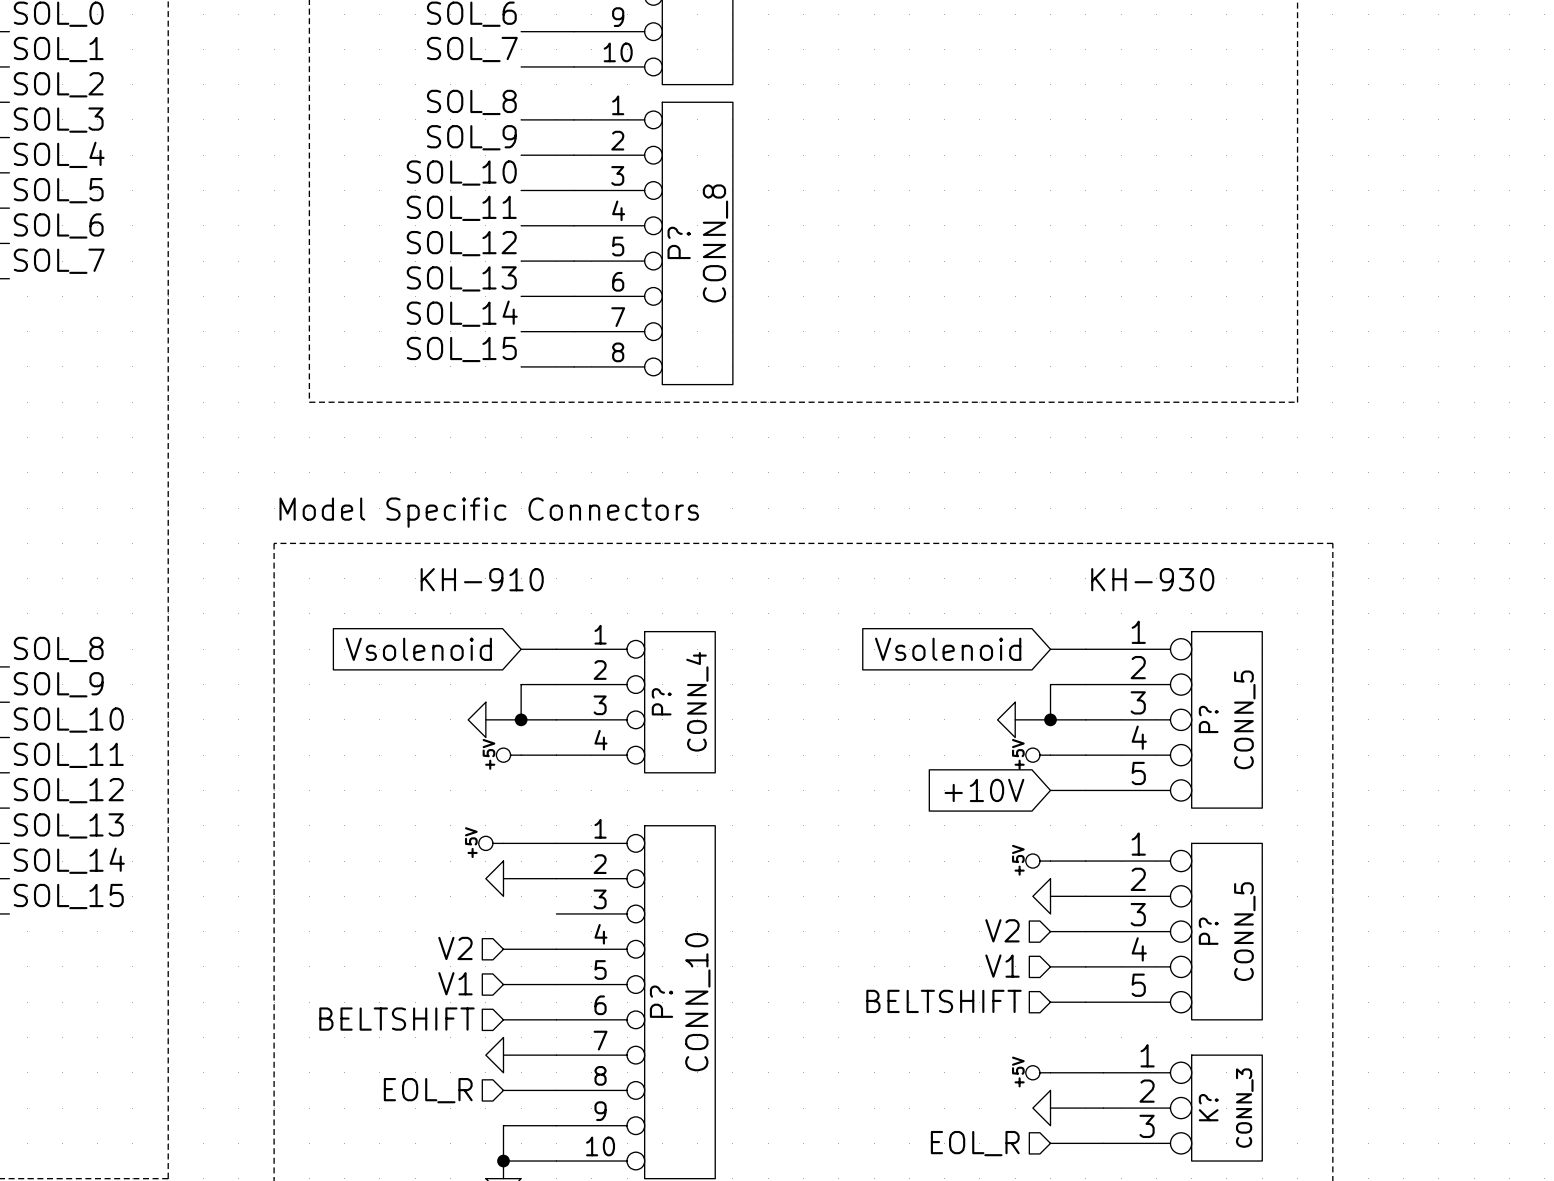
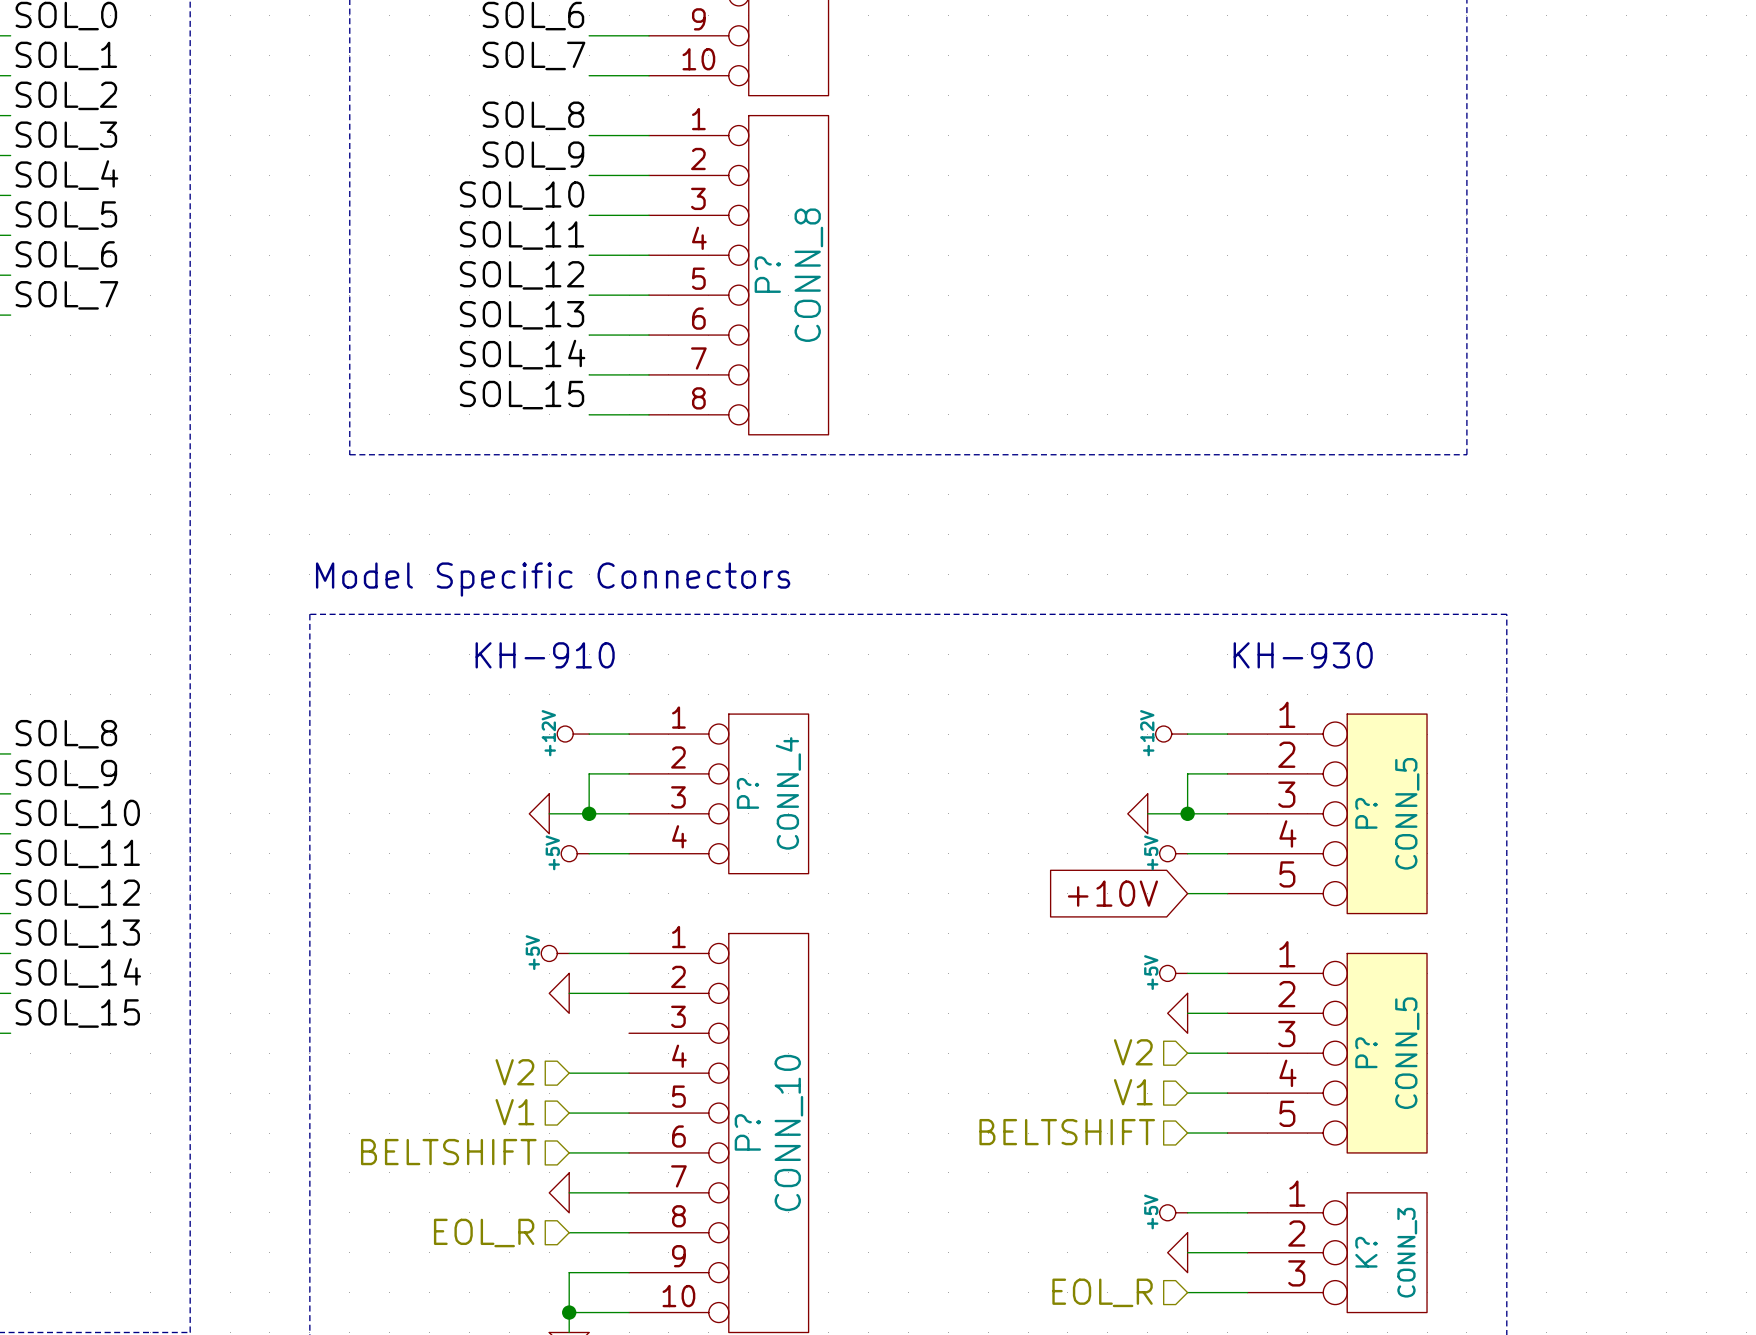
global label: Vsolenoid (418, 649) -> none
power symbol: none -> +12V (573, 734)
global label: Vsolenoid (948, 649) -> none
power symbol: none -> +12V (1171, 734)

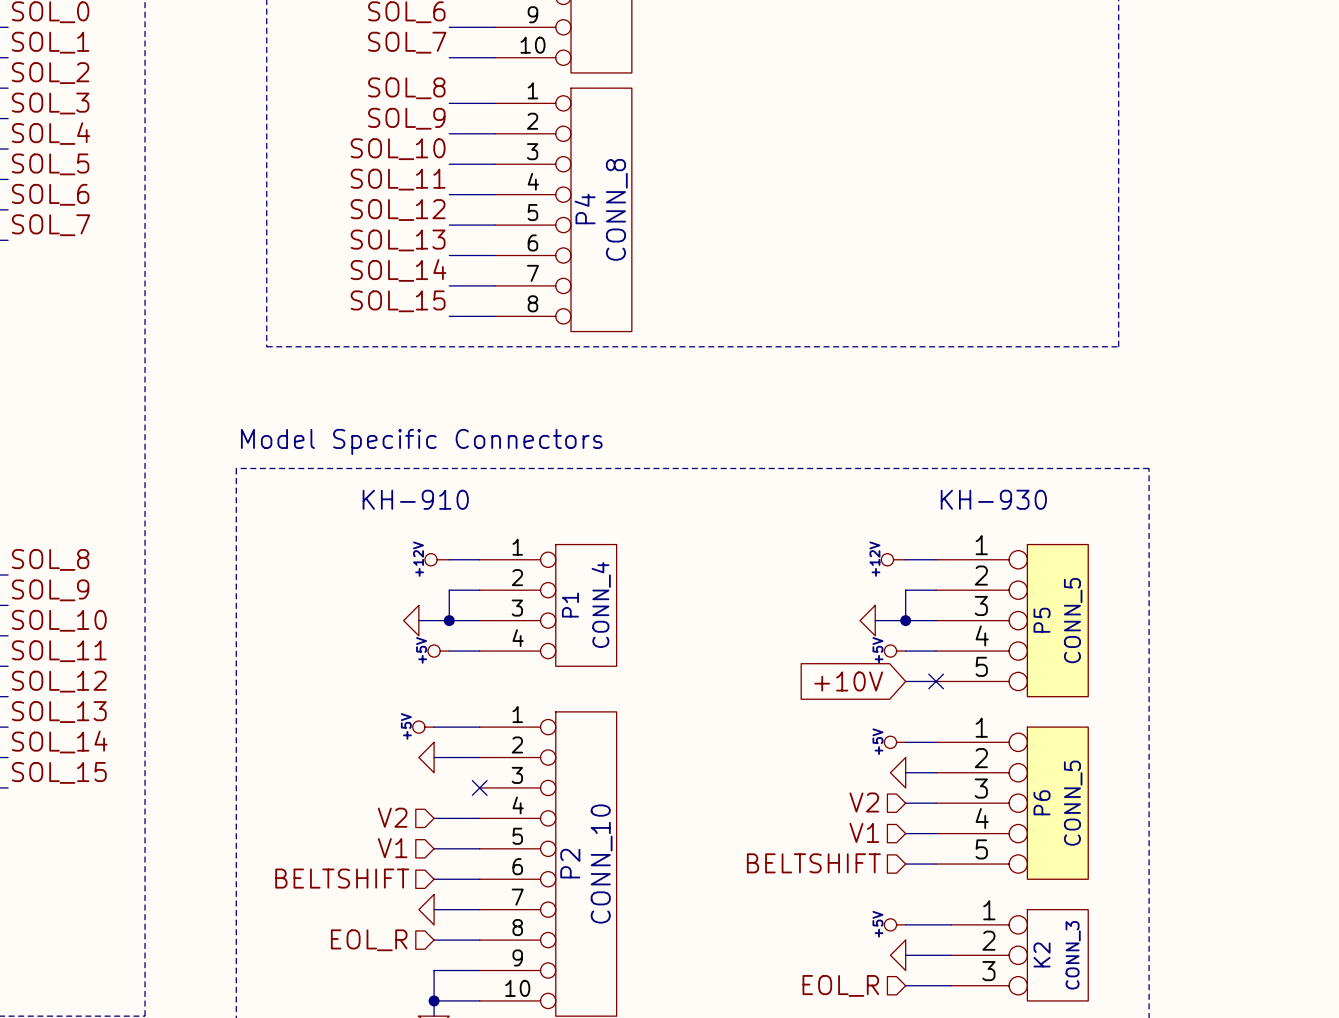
P? name: P? (767, 274) -> P4 (585, 208)
P? name: P? (748, 793) -> P1 (570, 605)
P? name: P? (1366, 813) -> P5 (1042, 620)
no-connect mark: none -> (936, 681)
no-connect mark: none -> (479, 787)
P? name: P? (1366, 1052) -> P6 (1042, 802)
P? name: P? (747, 1132) -> P2 (570, 863)
K? name: K? (1366, 1252) -> K2 (1042, 954)

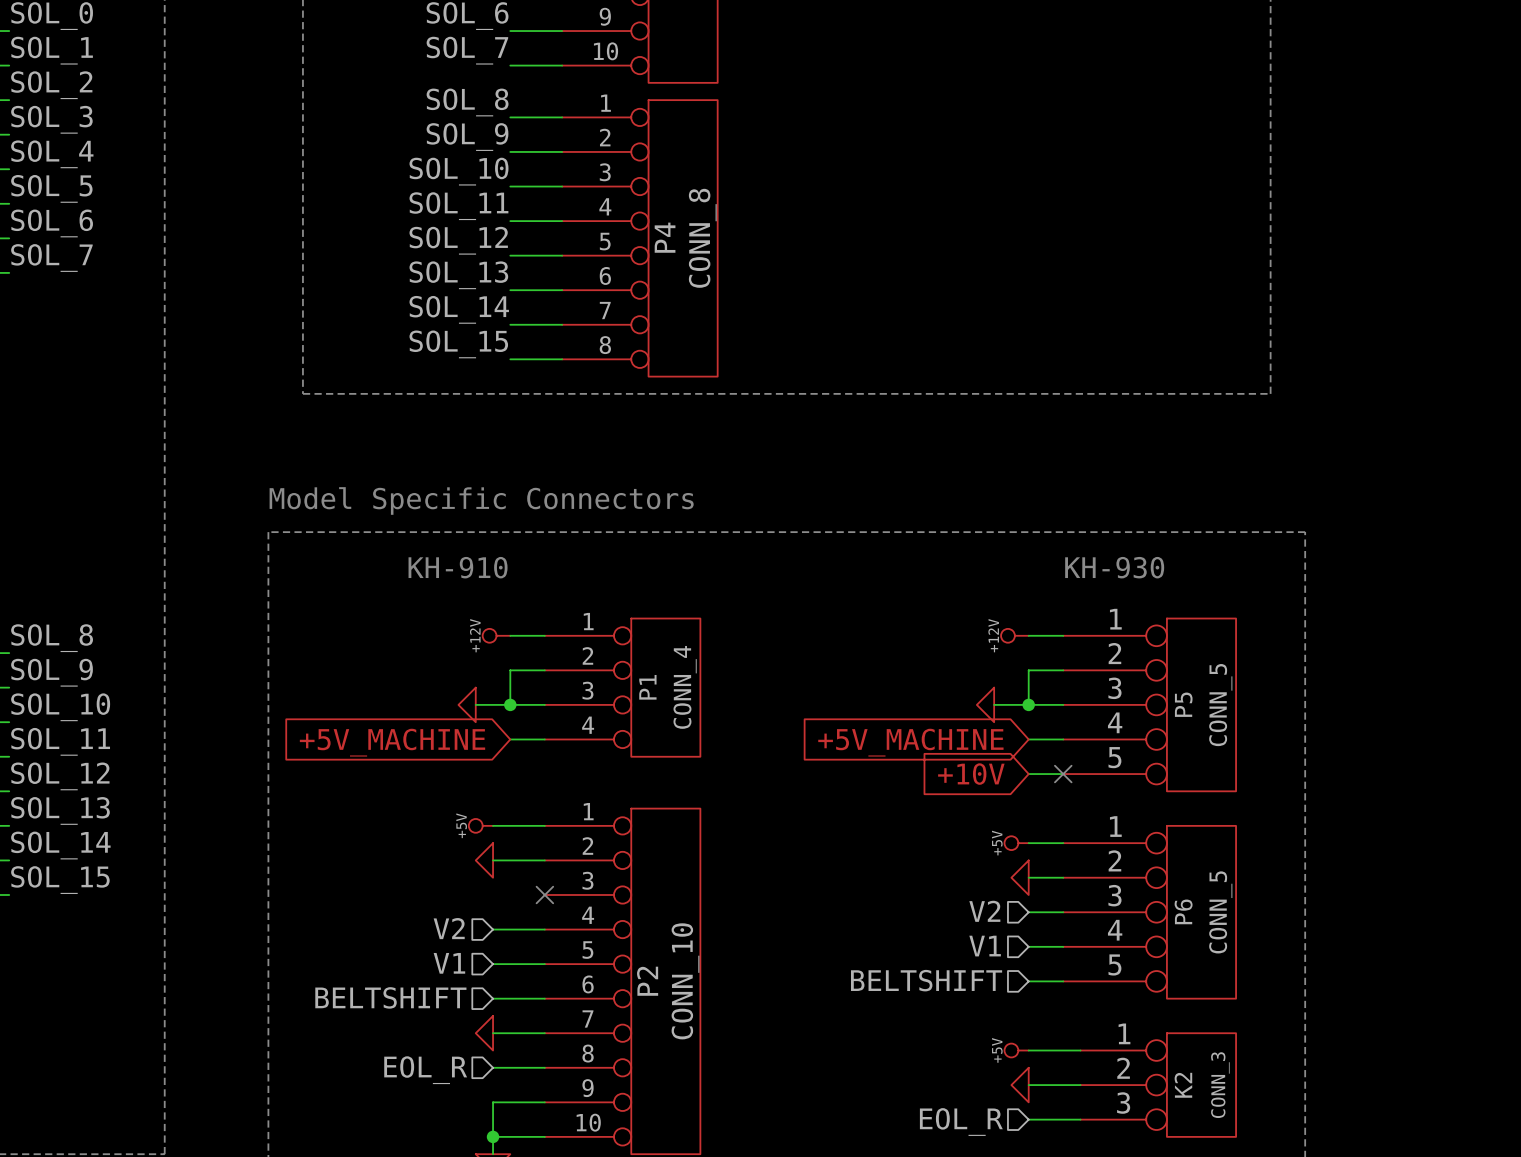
global label: none -> +5V_MACHINE (392, 742)
power symbol: +5V (438, 651) -> none
global label: none -> +5V_MACHINE (910, 742)
power symbol: +5V (895, 651) -> none

